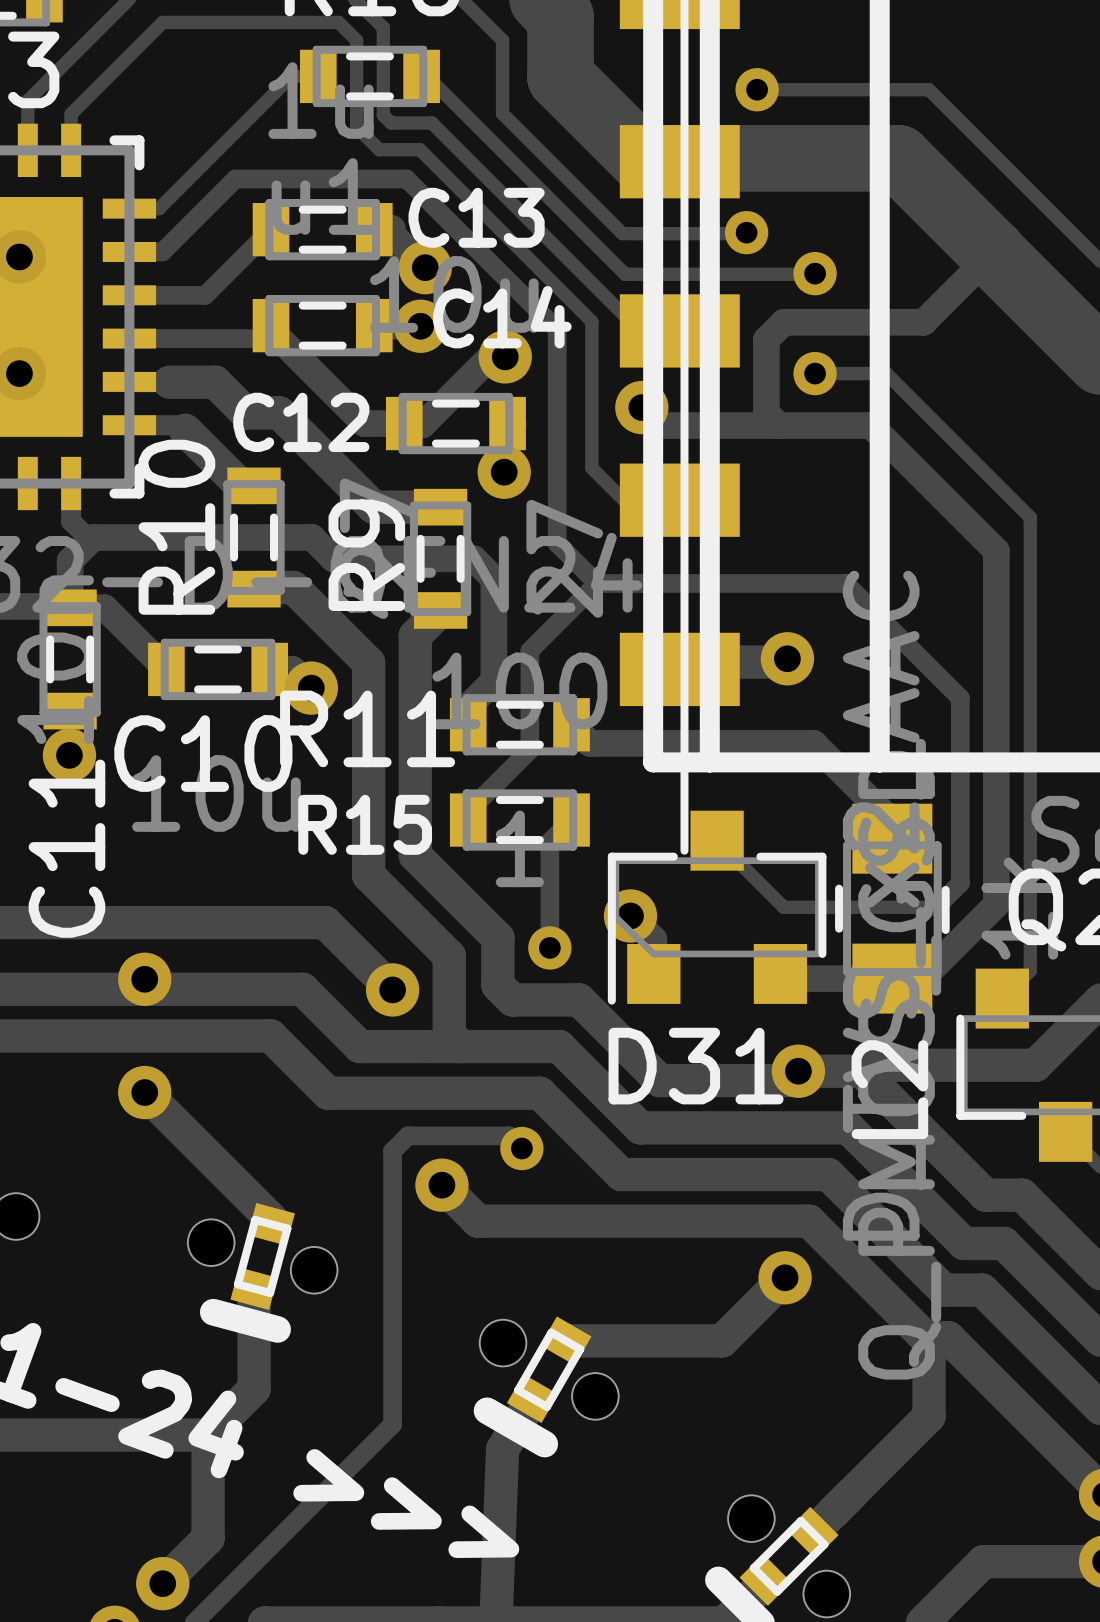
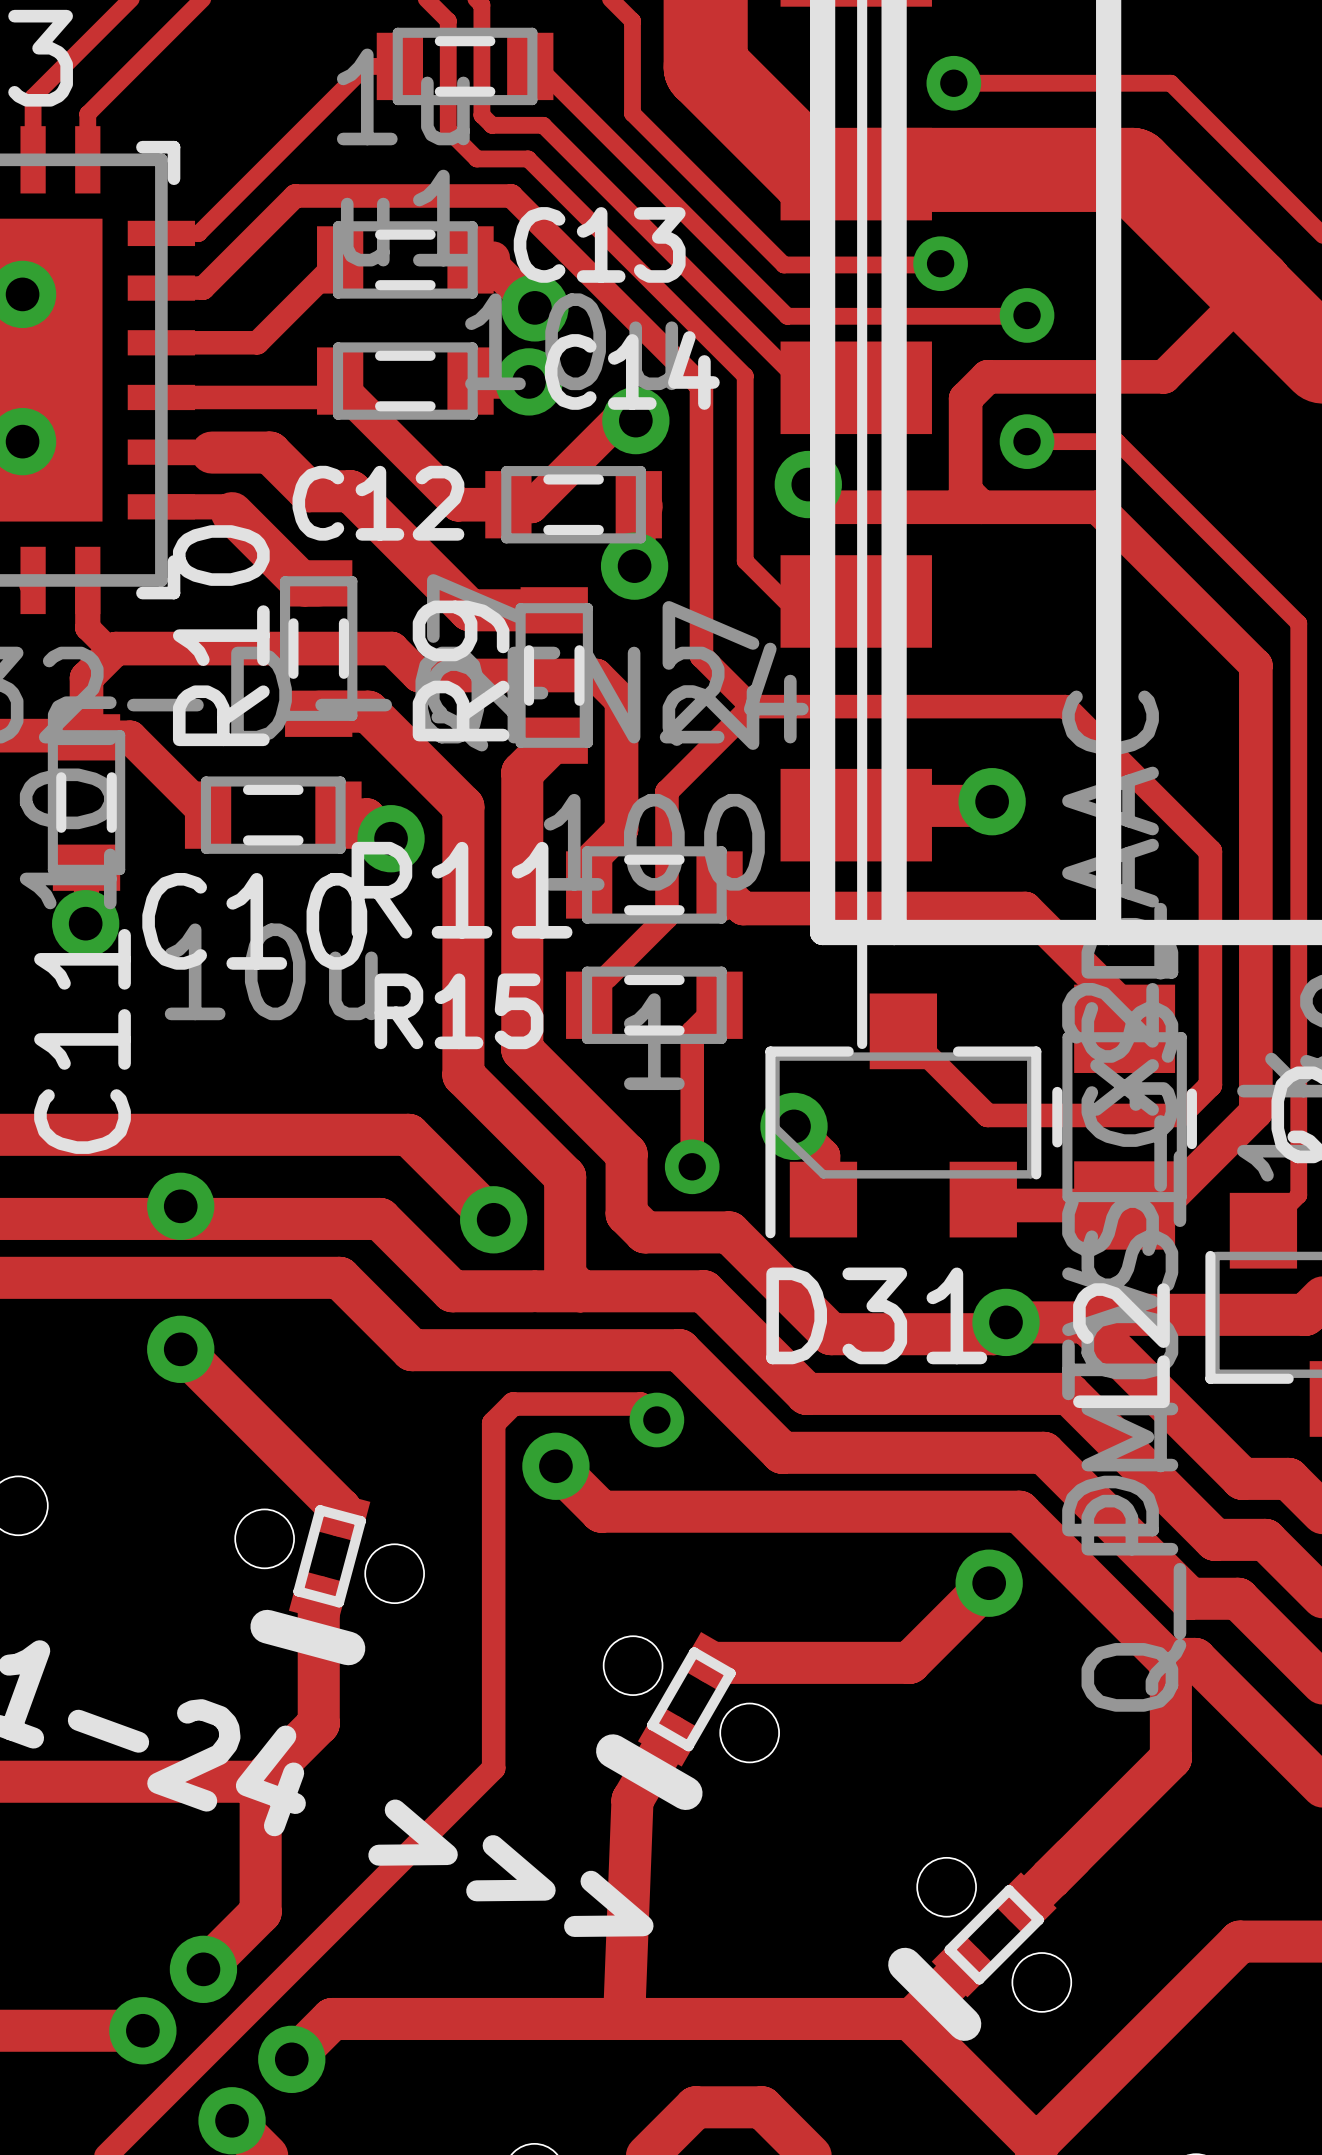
track width: thin (717, 840) (783, 907) (936, 907) -> thick (903, 1031) (987, 1115) (1180, 1115)

